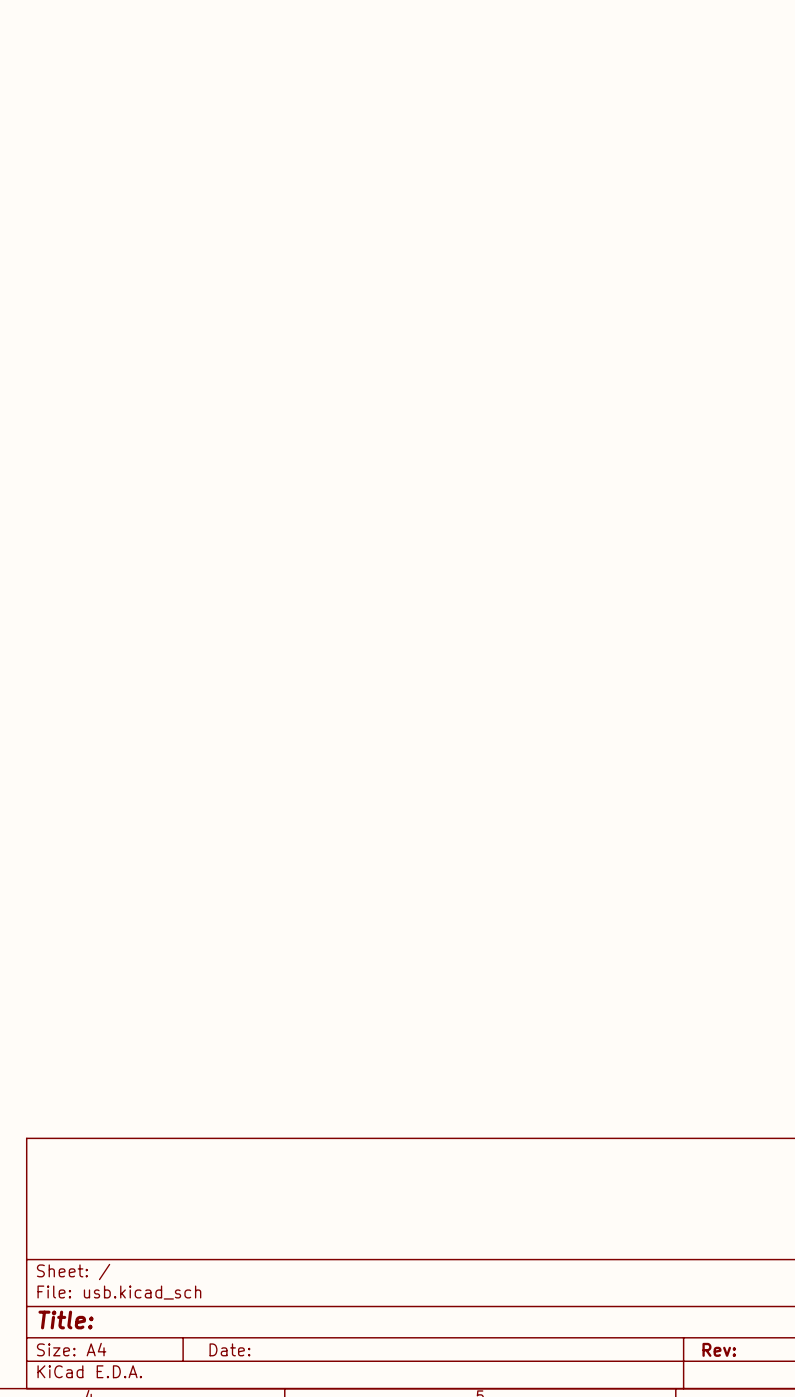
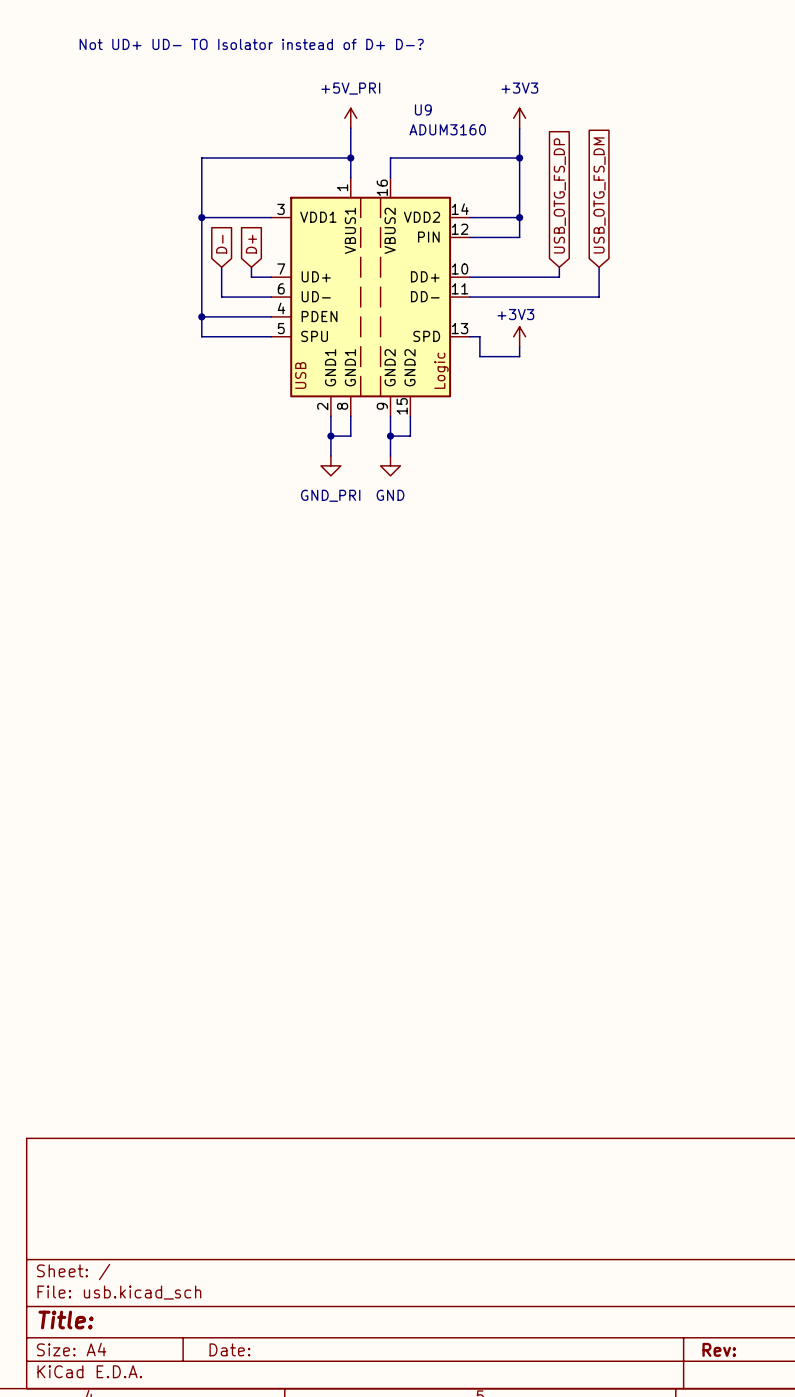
text: none -> Not UD+ UD- TO Isolator instead of D+ D-? (251, 44)
power symbol: none -> +5V_PRI (350, 118)
power symbol: none -> +3V3 (519, 118)
wire: none -> (350, 128) (350, 177)
wire: none -> (519, 128) (519, 237) (469, 237)
wire: none -> (350, 157) (201, 157) (201, 336) (271, 336)
junction: none -> (350, 157)
wire: none -> (519, 157) (390, 157) (390, 177)
junction: none -> (519, 157)
global label: none -> USB_OTG_FS_DP (559, 195)
global label: none -> USB_OTG_FS_DM (599, 195)
wire: none -> (201, 217) (271, 217)
junction: none -> (201, 217)
wire: none -> (469, 217) (519, 217)
junction: none -> (519, 217)
global label: none -> D- (221, 244)
global label: none -> D+ (251, 244)
wire: none -> (221, 267) (221, 297) (271, 297)
wire: none -> (251, 267) (251, 277) (271, 277)
wire: none -> (559, 267) (559, 277) (469, 277)
wire: none -> (599, 267) (599, 297) (469, 297)
U9: none -> ADUM3160 (370, 297)
wire: none -> (201, 316) (271, 316)
junction: none -> (201, 316)
wire: none -> (469, 336) (479, 336) (479, 356) (519, 356) (519, 346)
power symbol: none -> +3V3 (519, 336)
wire: none -> (330, 416) (330, 455)
wire: none -> (350, 416) (350, 436) (330, 436)
wire: none -> (390, 416) (390, 455)
wire: none -> (410, 416) (410, 436) (390, 436)
junction: none -> (330, 436)
junction: none -> (390, 436)
power symbol: none -> GND_PRI (330, 465)
power symbol: none -> GND (390, 465)

